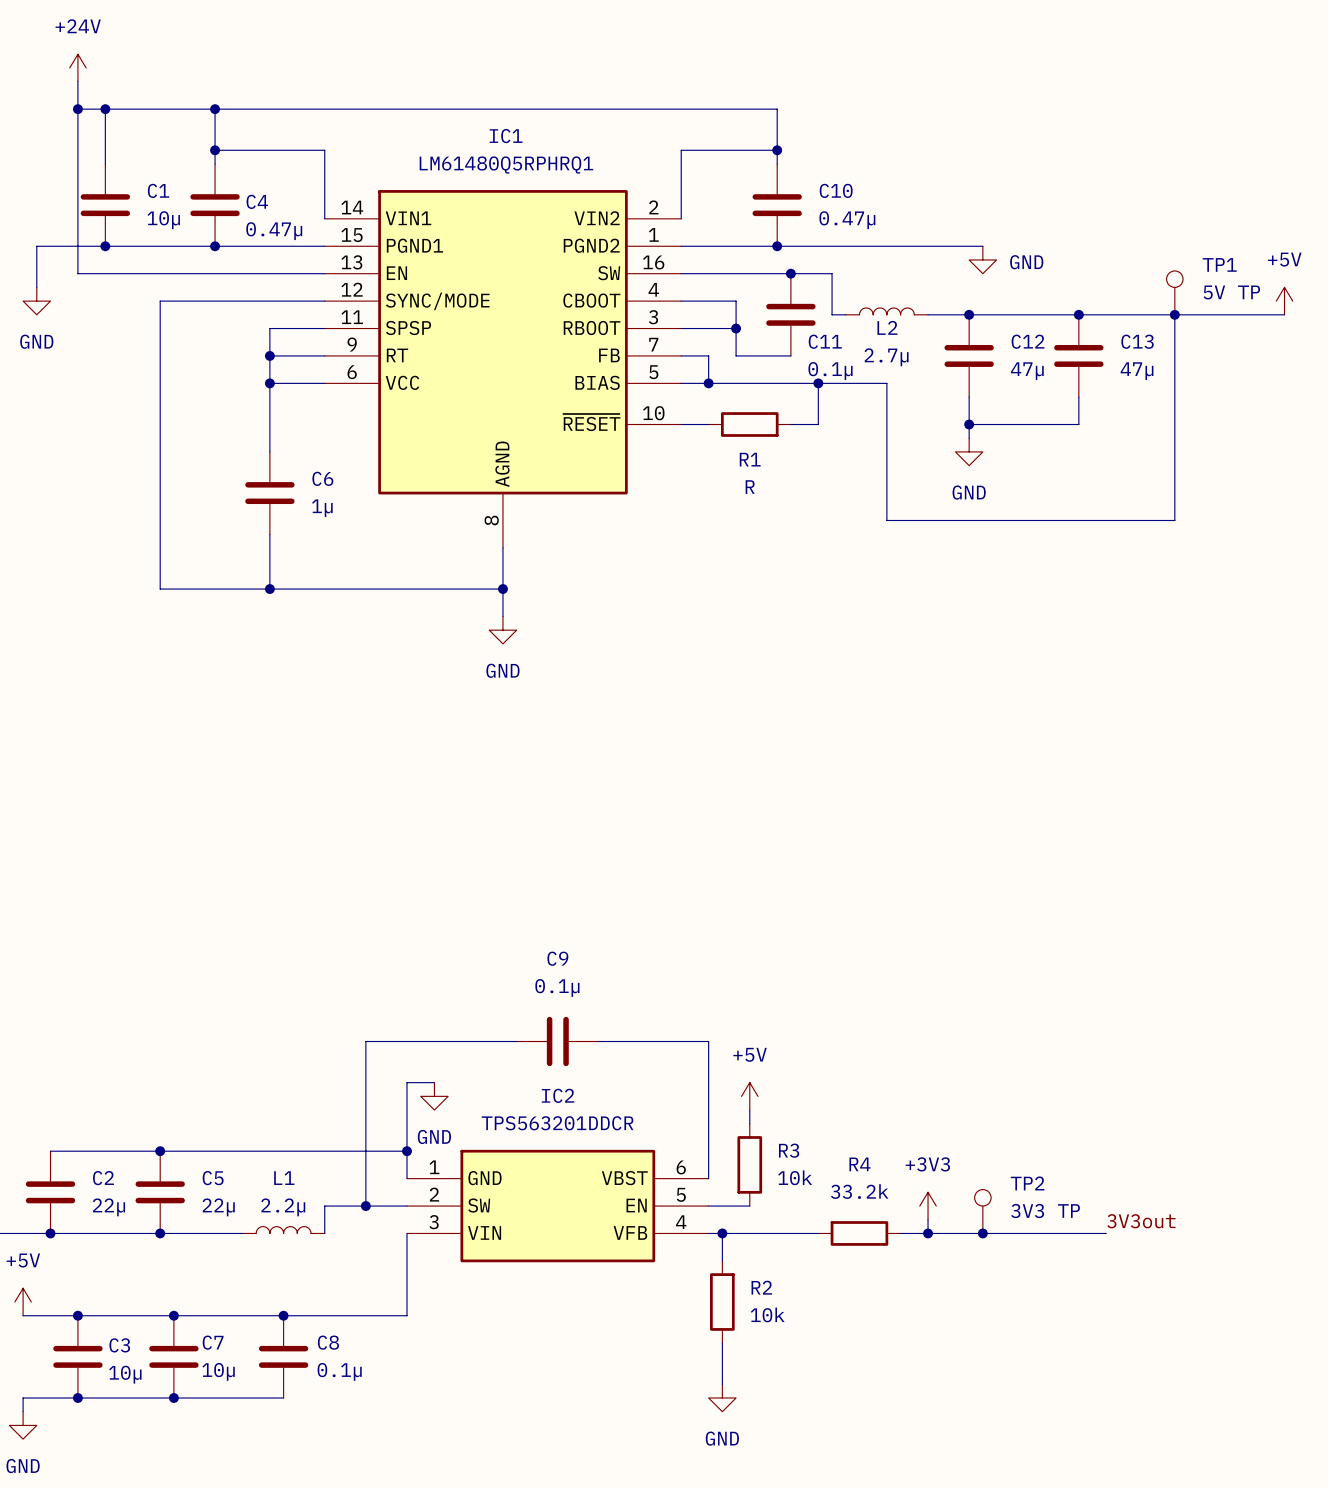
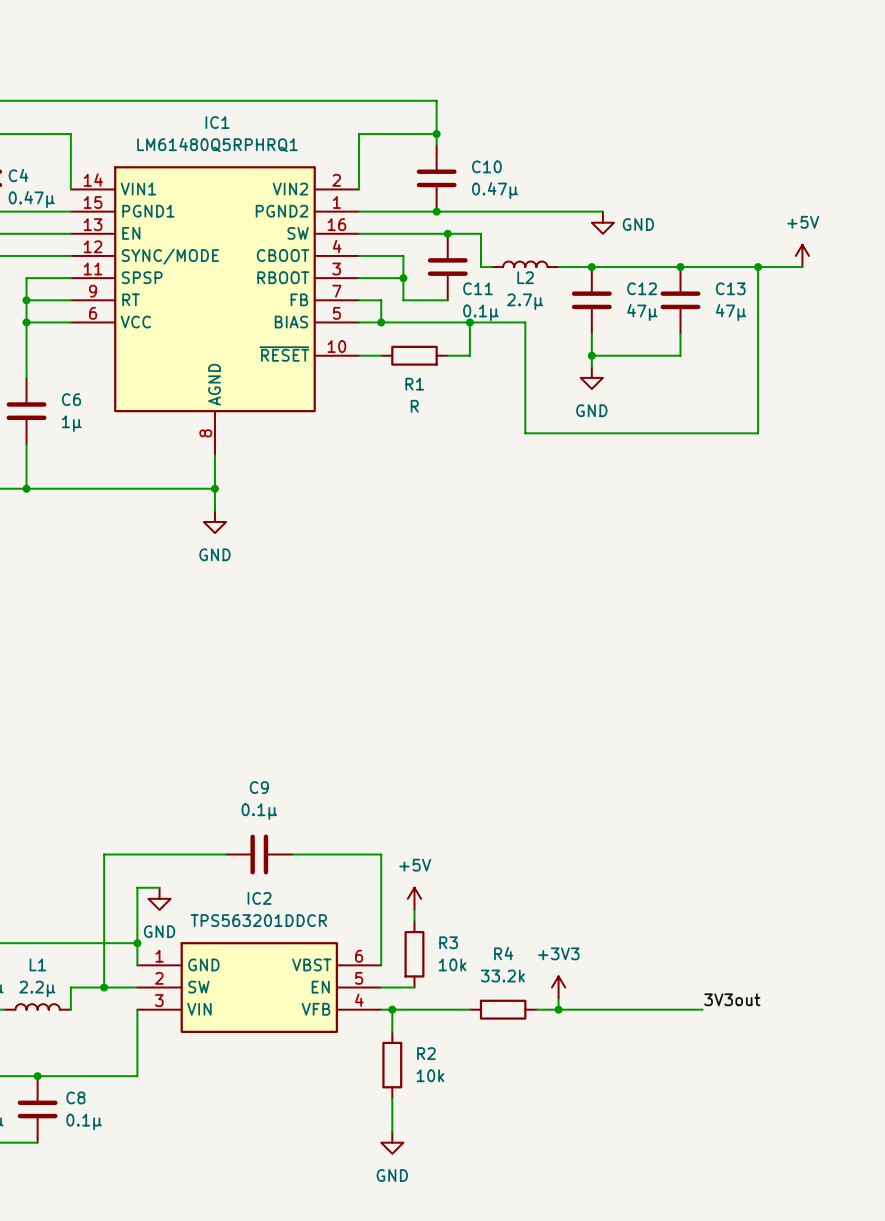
TP1: 5V TP (1174, 292) -> none
power symbol position: +5V (1284, 301) -> +5V (802, 255)
wire: (1229, 314) (1284, 314) -> none
TP2: 3V3 TP (982, 1211) -> none
junction: (982, 1233) -> none

